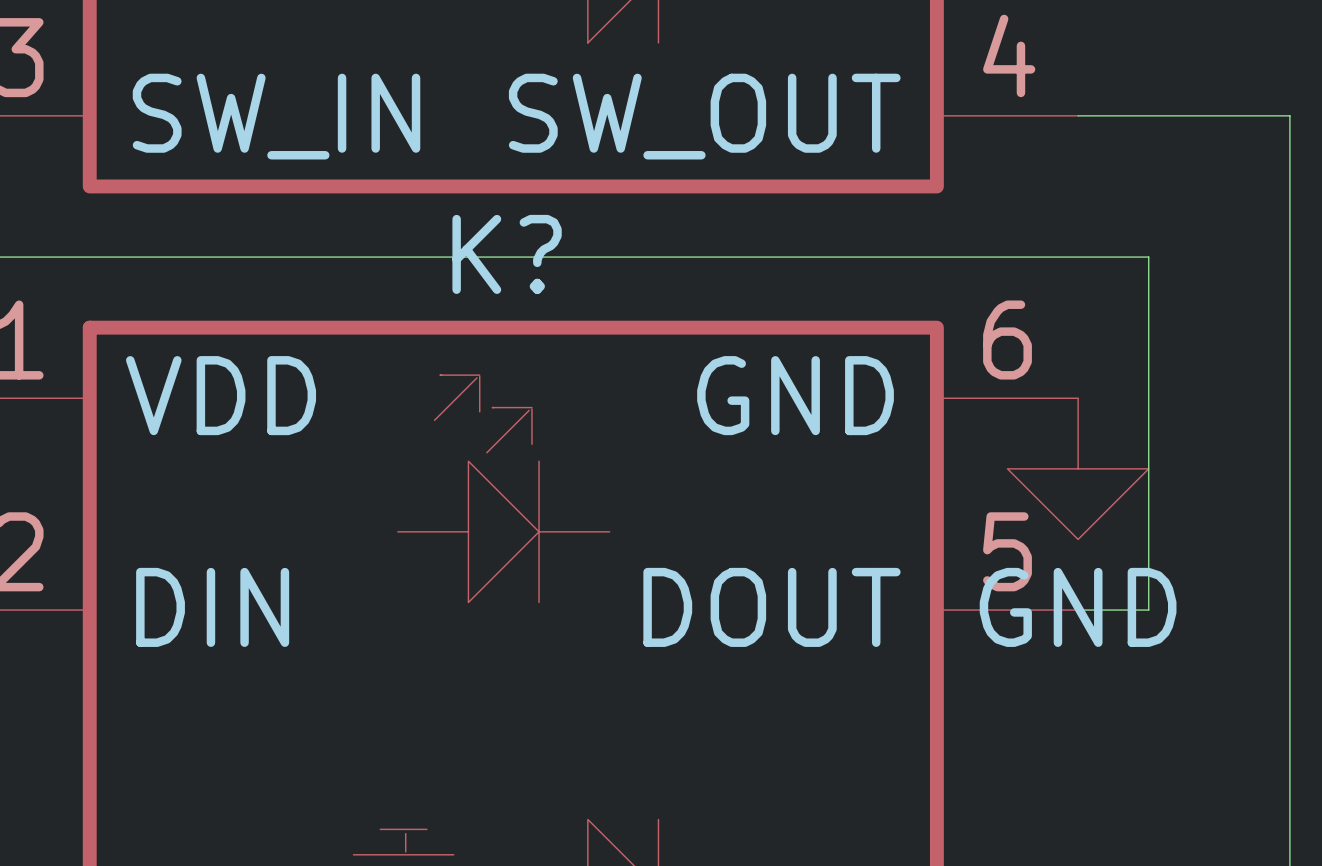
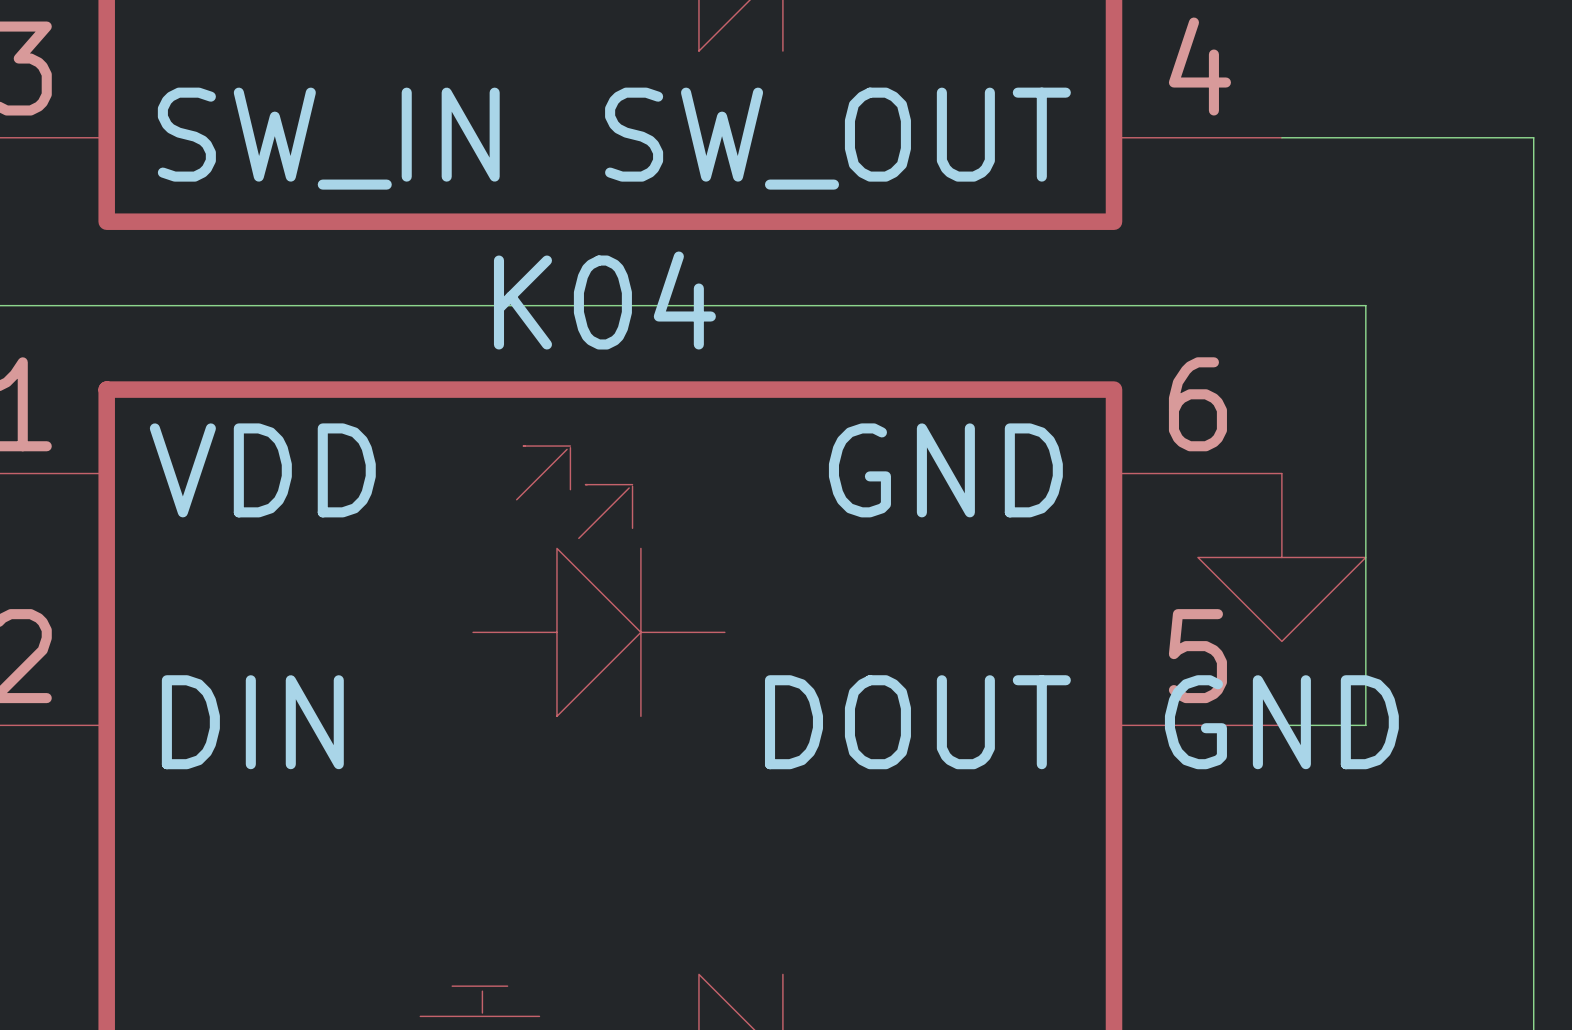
K? name: K? (507, 254) -> K04 (604, 300)

